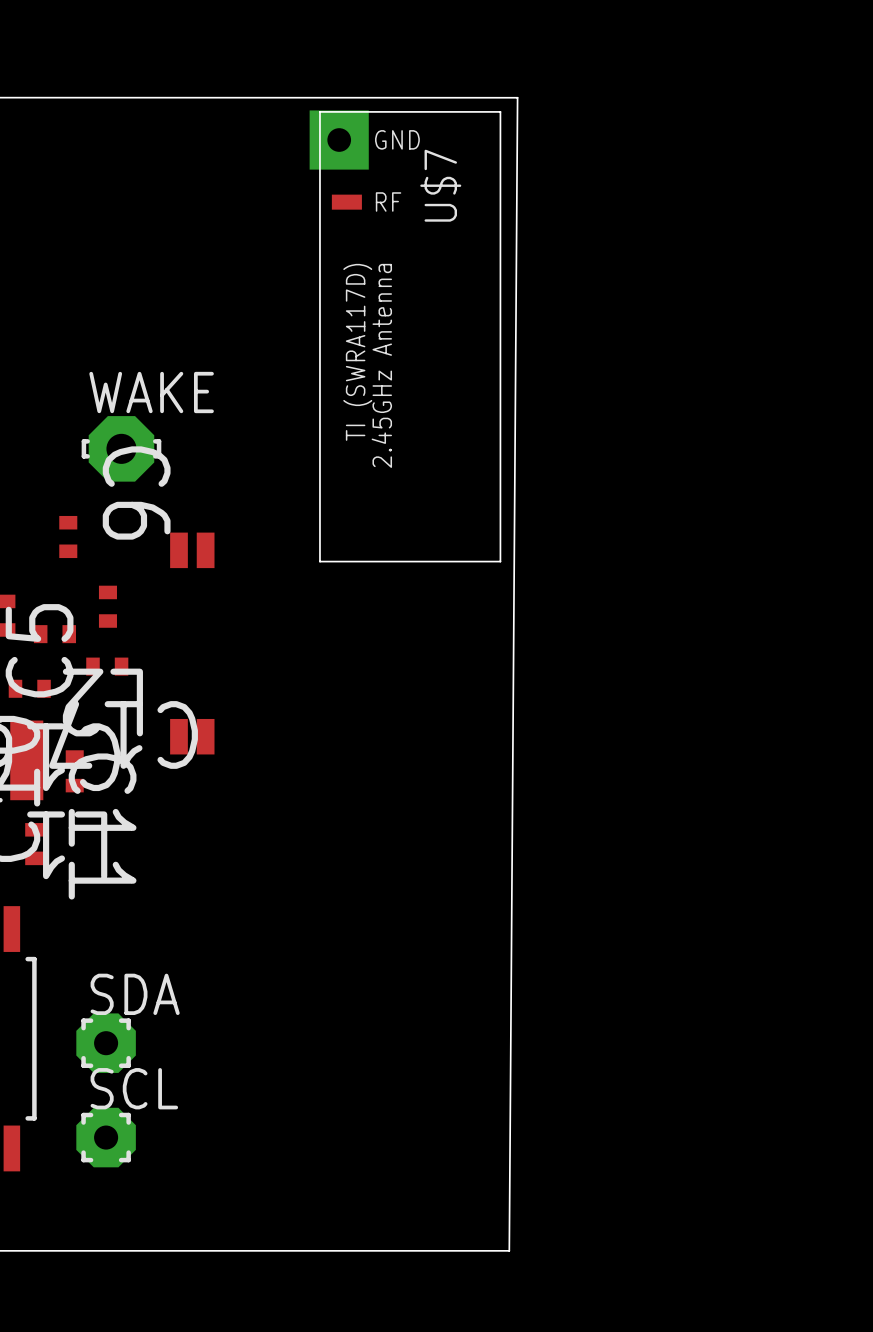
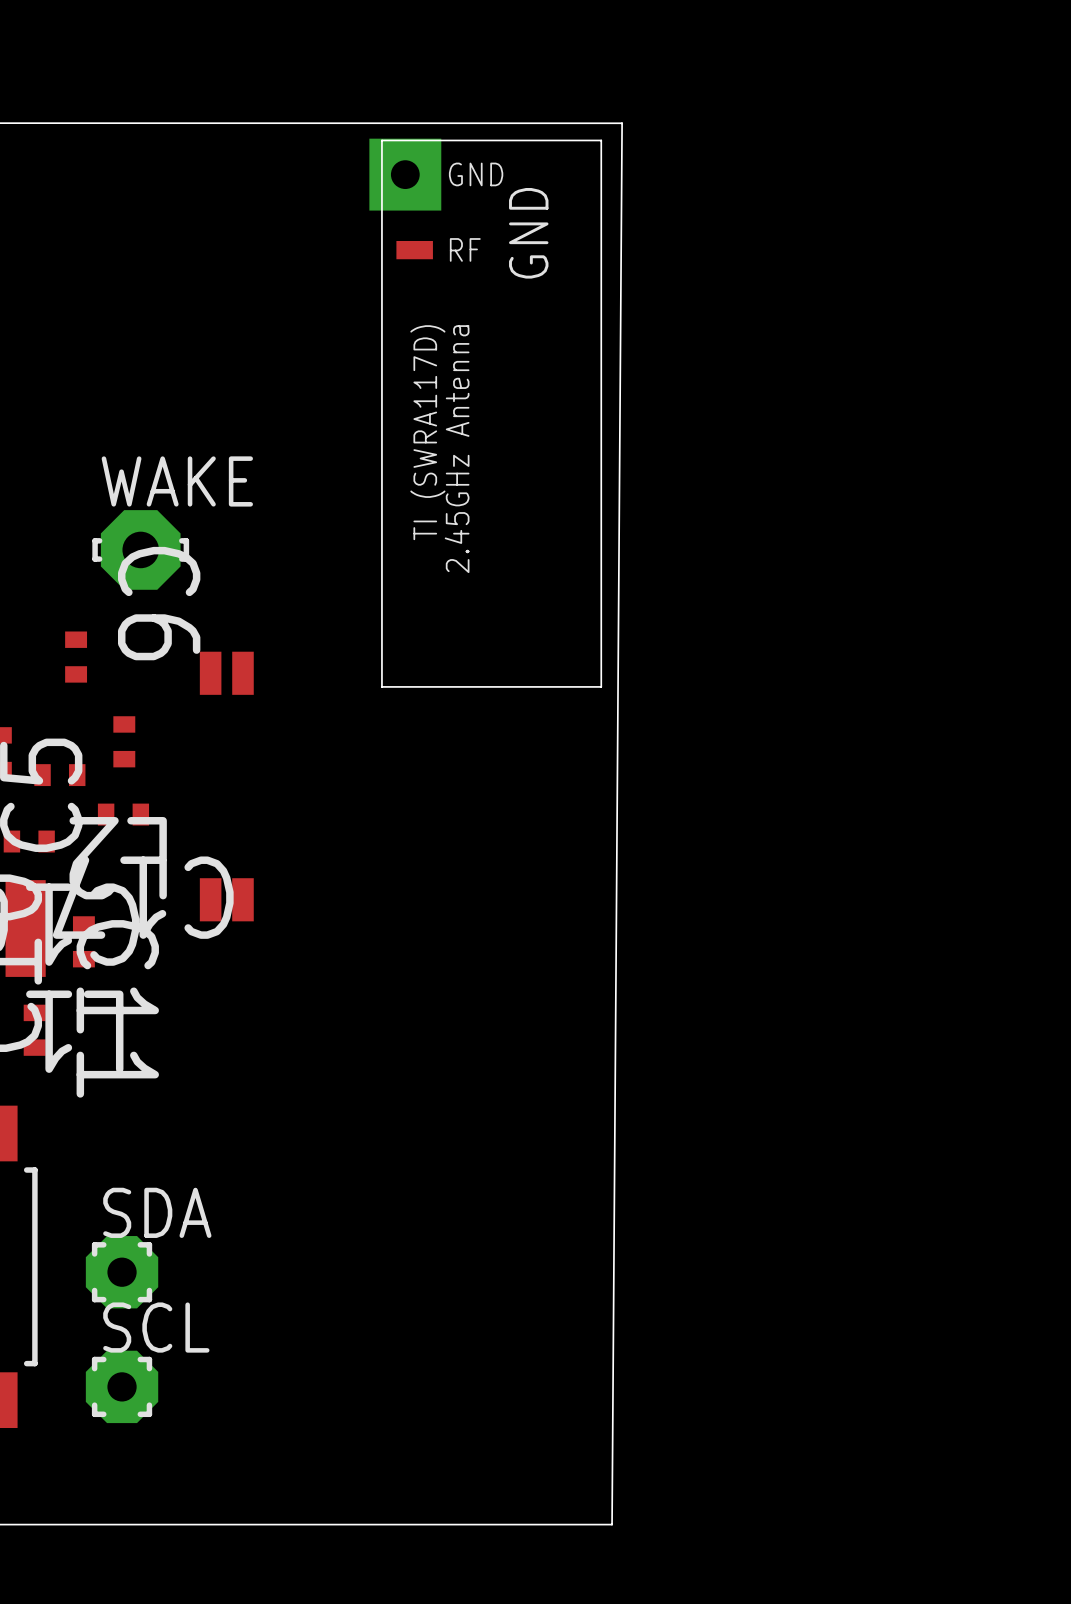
U$7 name: U$7 (440, 185) -> GND (528, 233)

